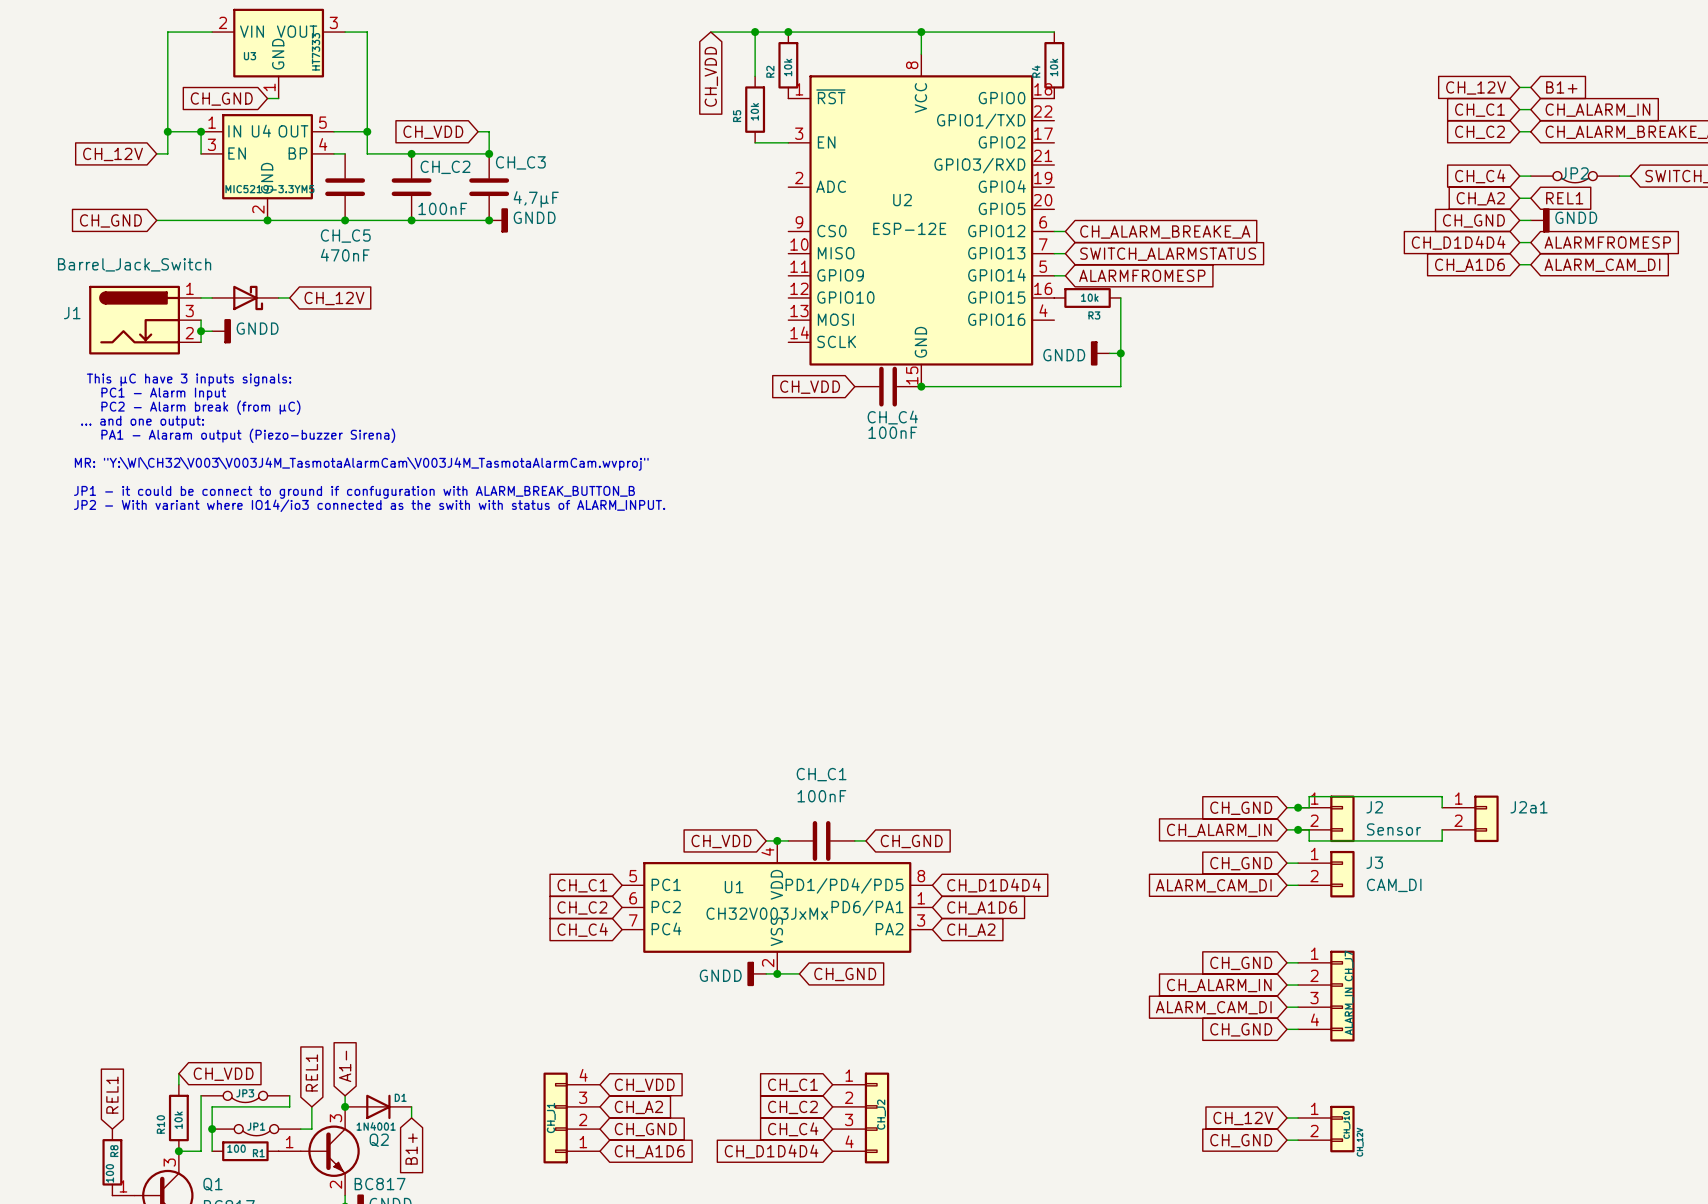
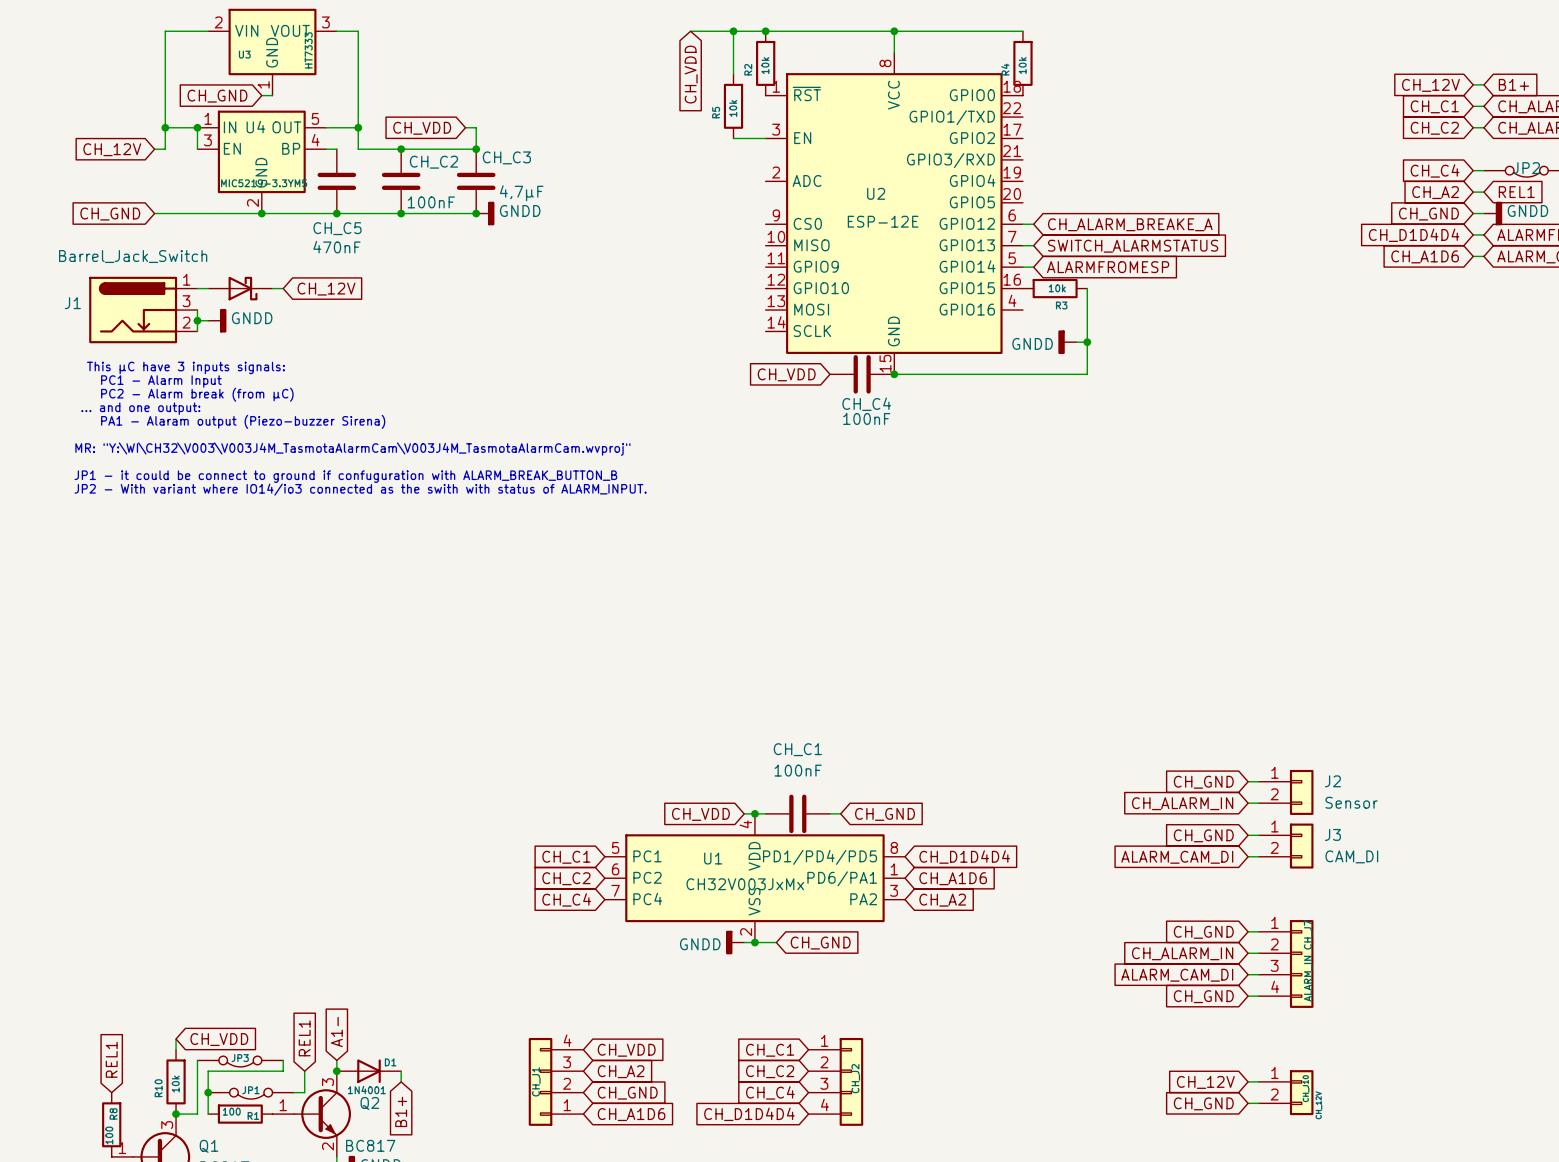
wire: (1298, 807) (1309, 807) (1309, 796) (1442, 796) (1442, 807) -> none
junction: (1298, 807) -> none
J2a1: (1470, 818) -> none
wire: (1298, 829) (1309, 829) (1309, 840) (1442, 840) (1442, 829) -> none
junction: (1298, 829) -> none

